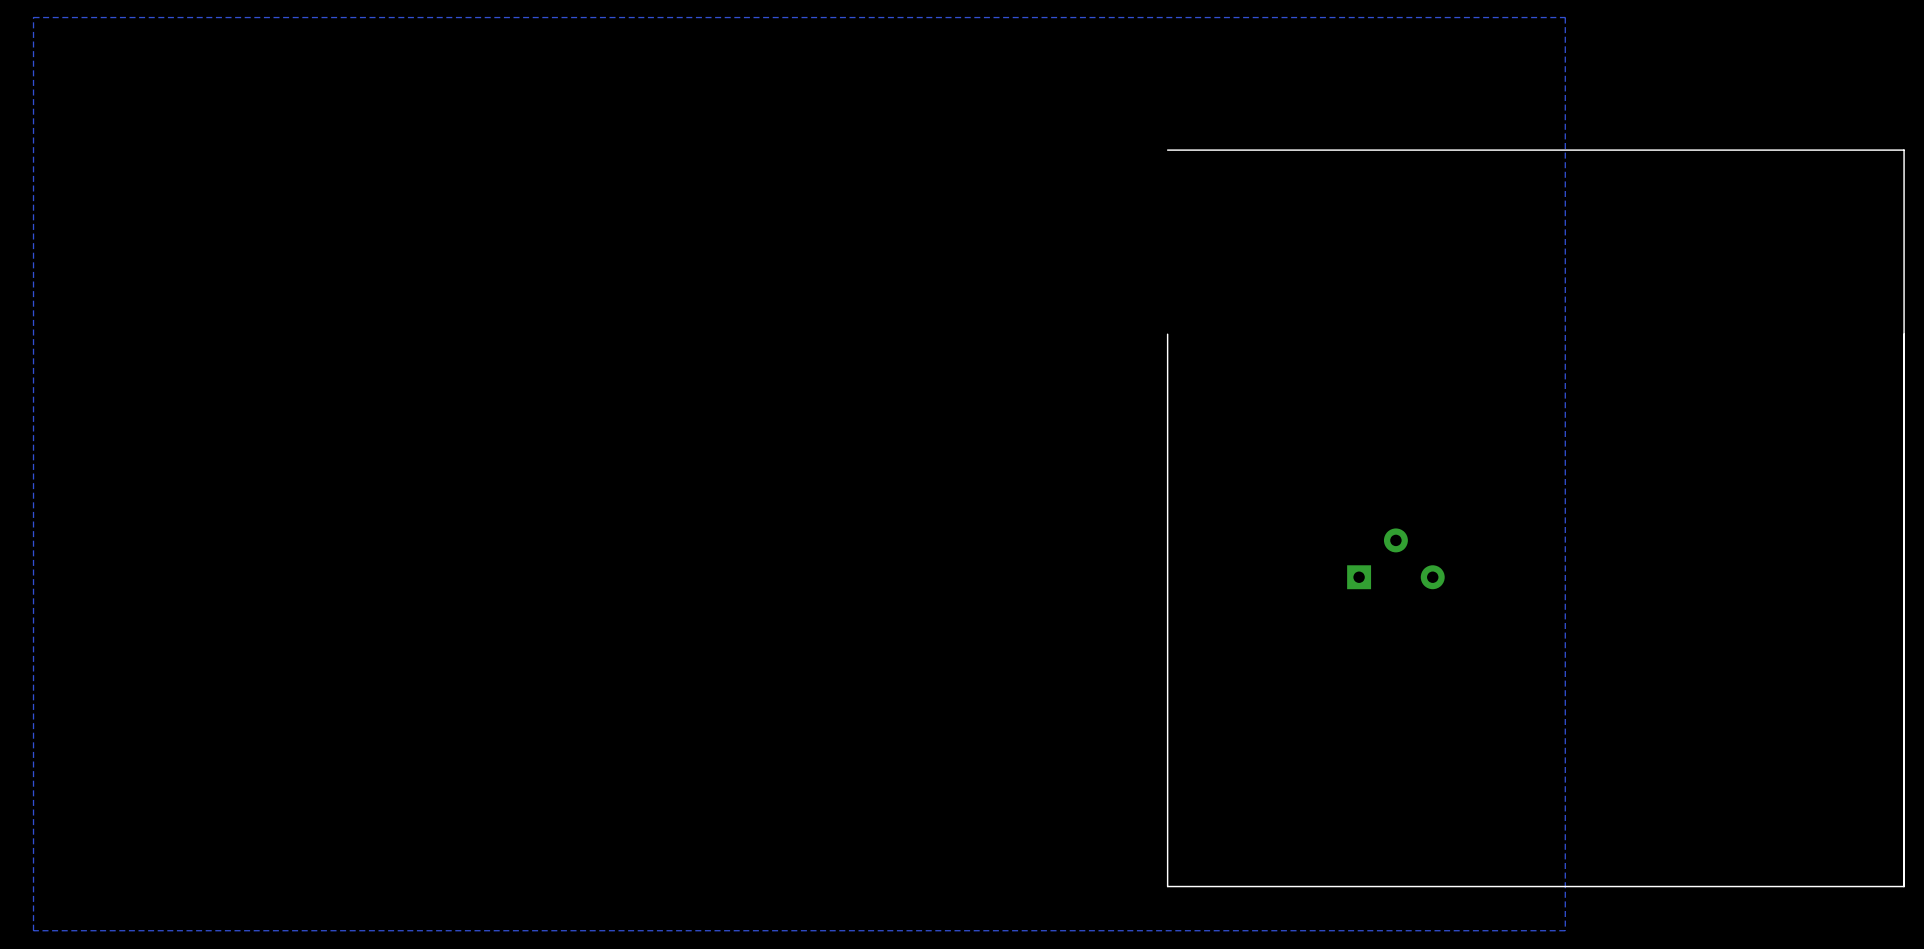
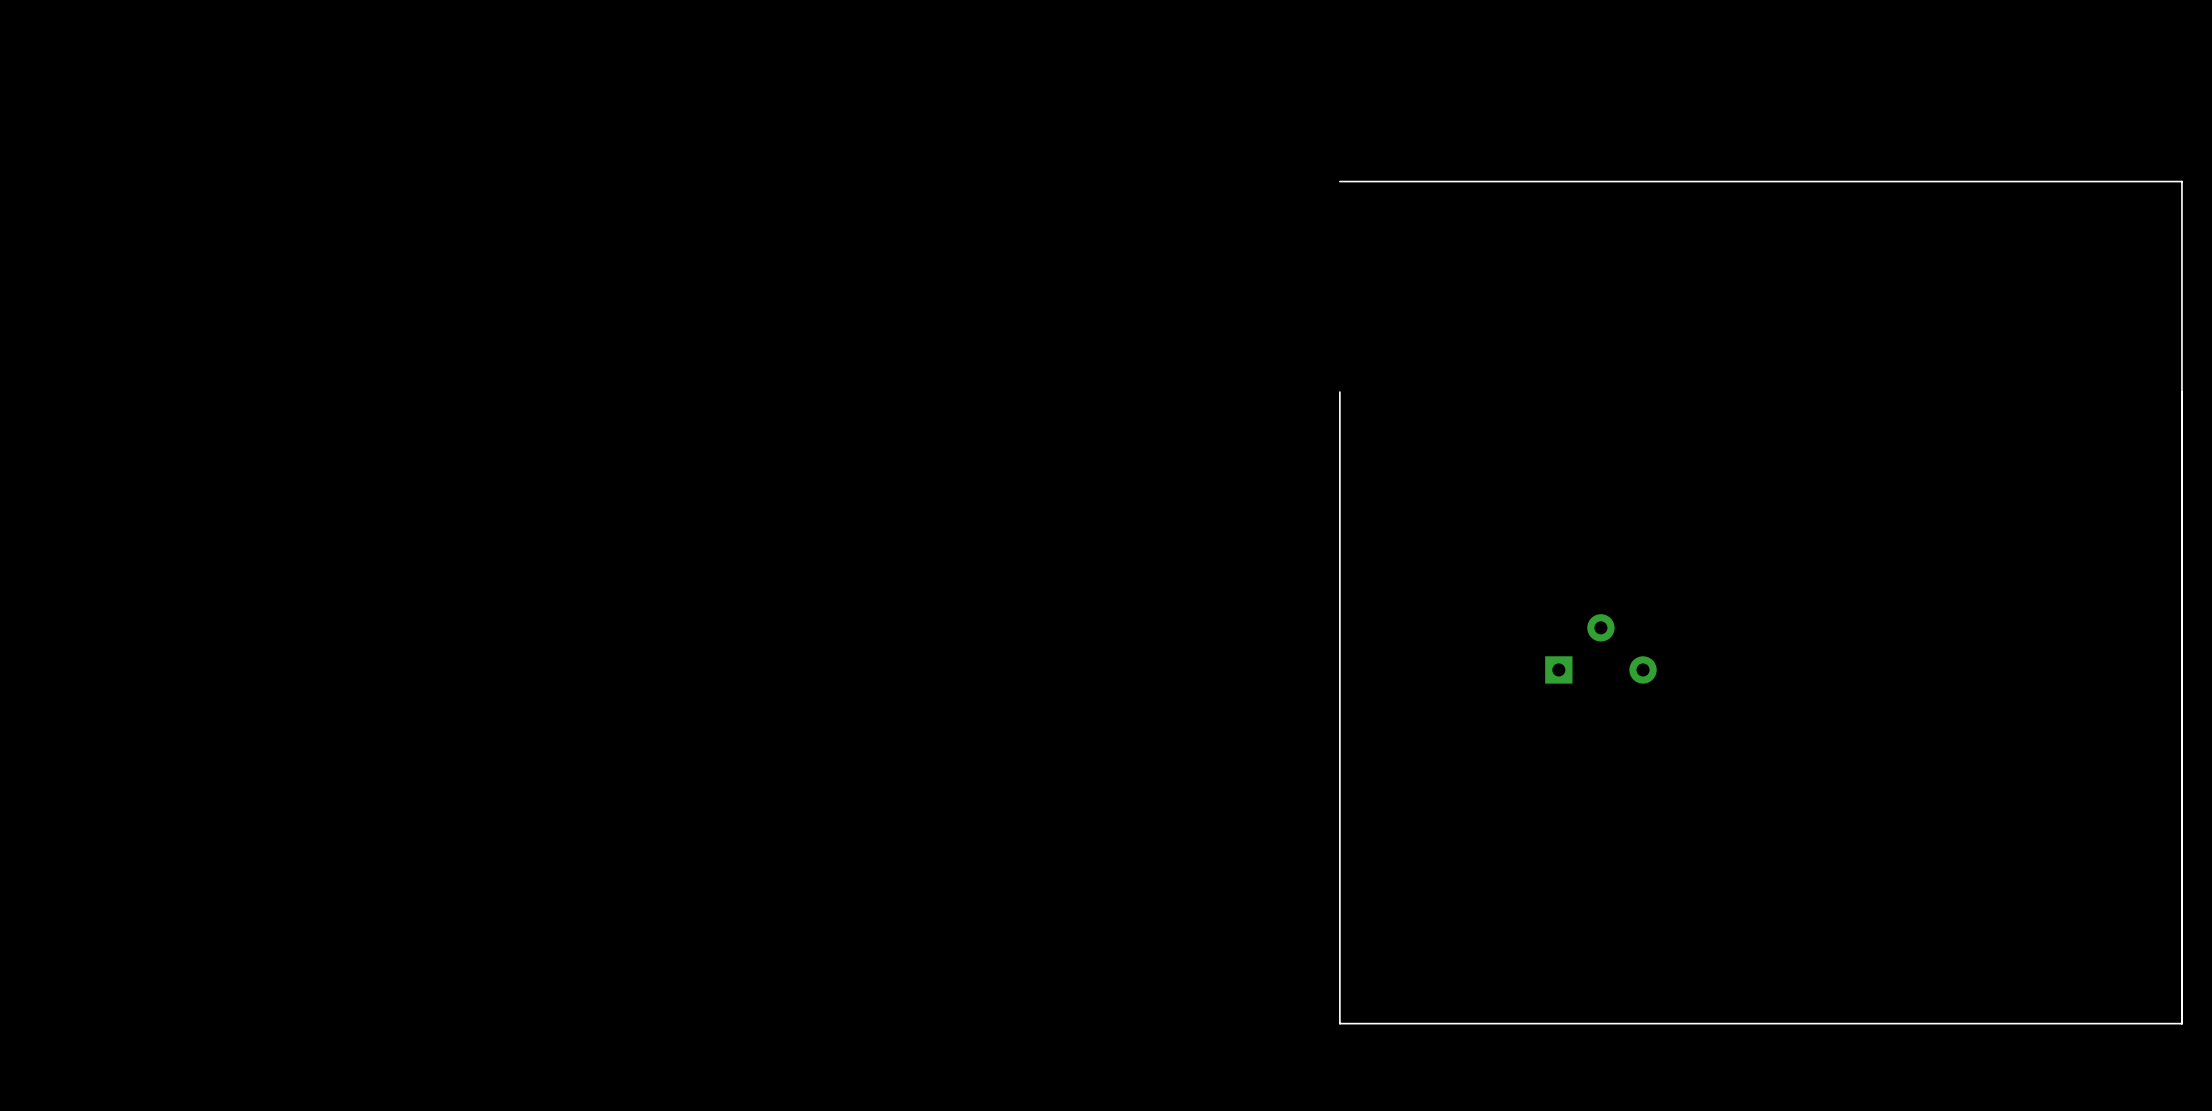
zone outline: (1565, 17) (1565, 930) (33, 930) (33, 17) (1565, 17) -> none

